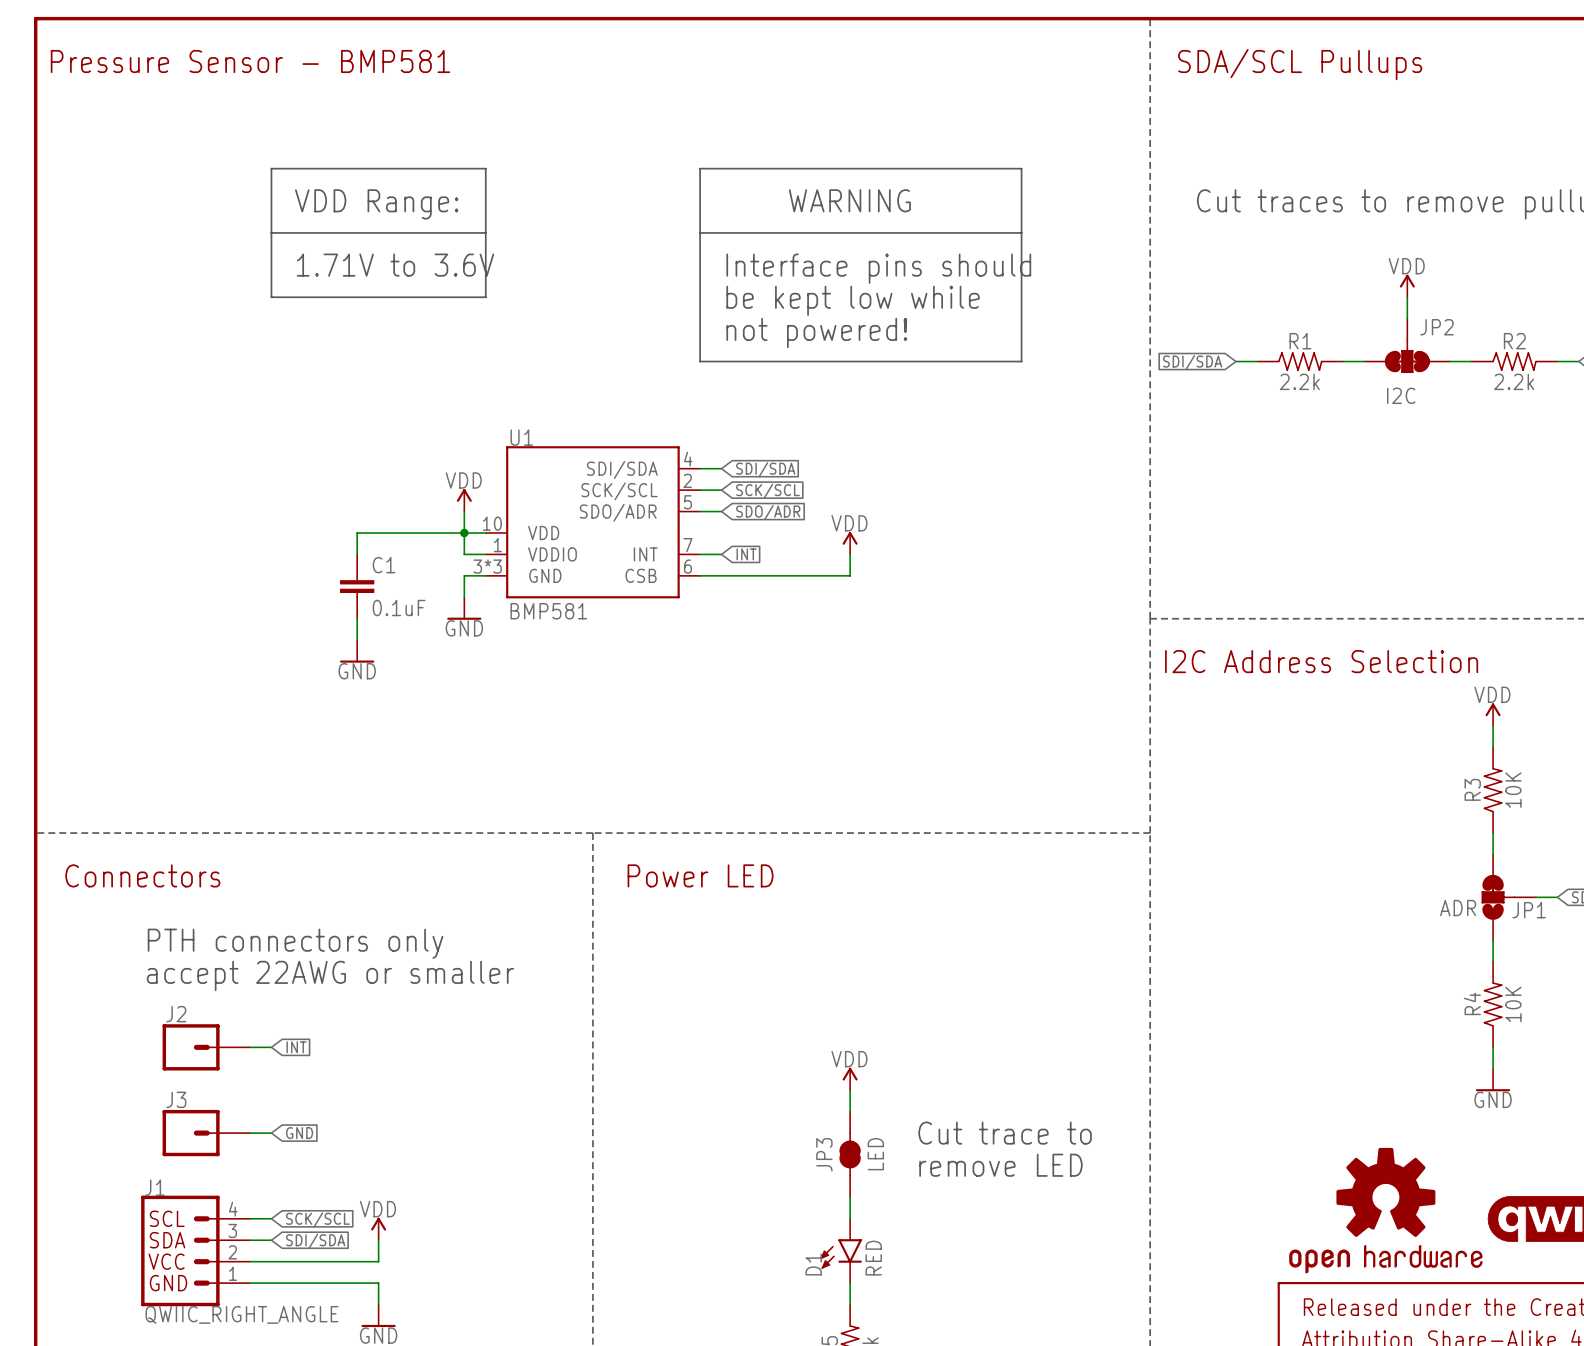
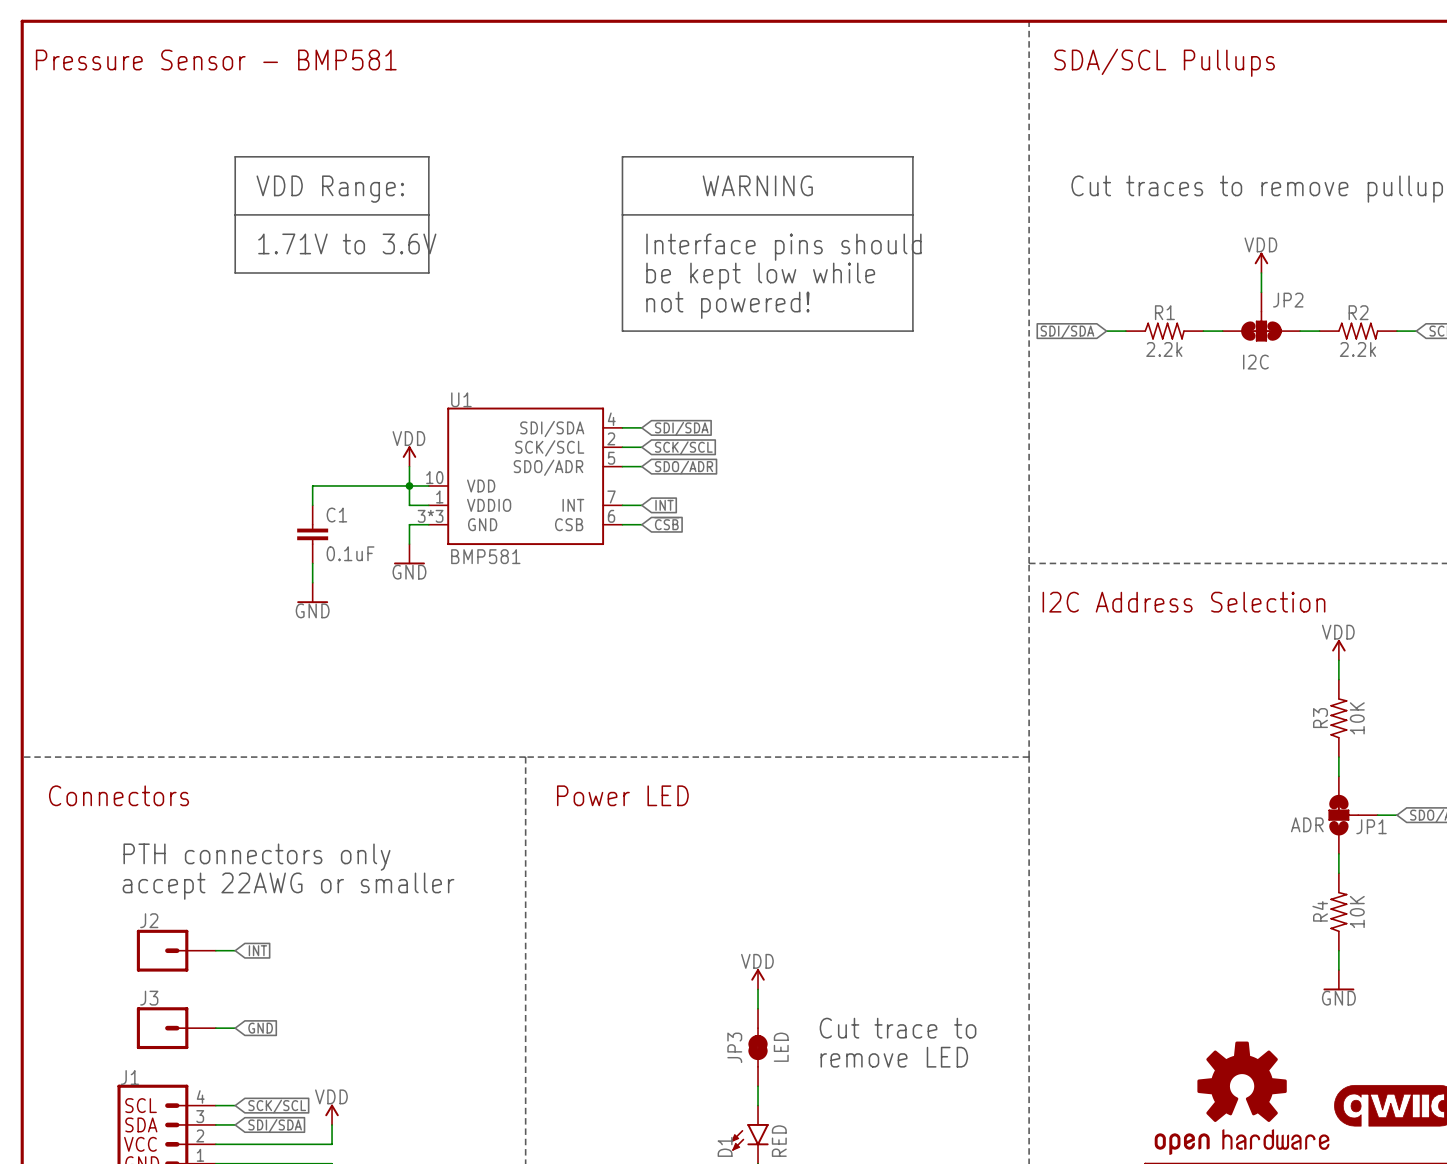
power symbol: VDD (850, 543) -> none
wire: (850, 554) (850, 575) (721, 575) -> none
global label: none -> ~{CSB} (666, 523)

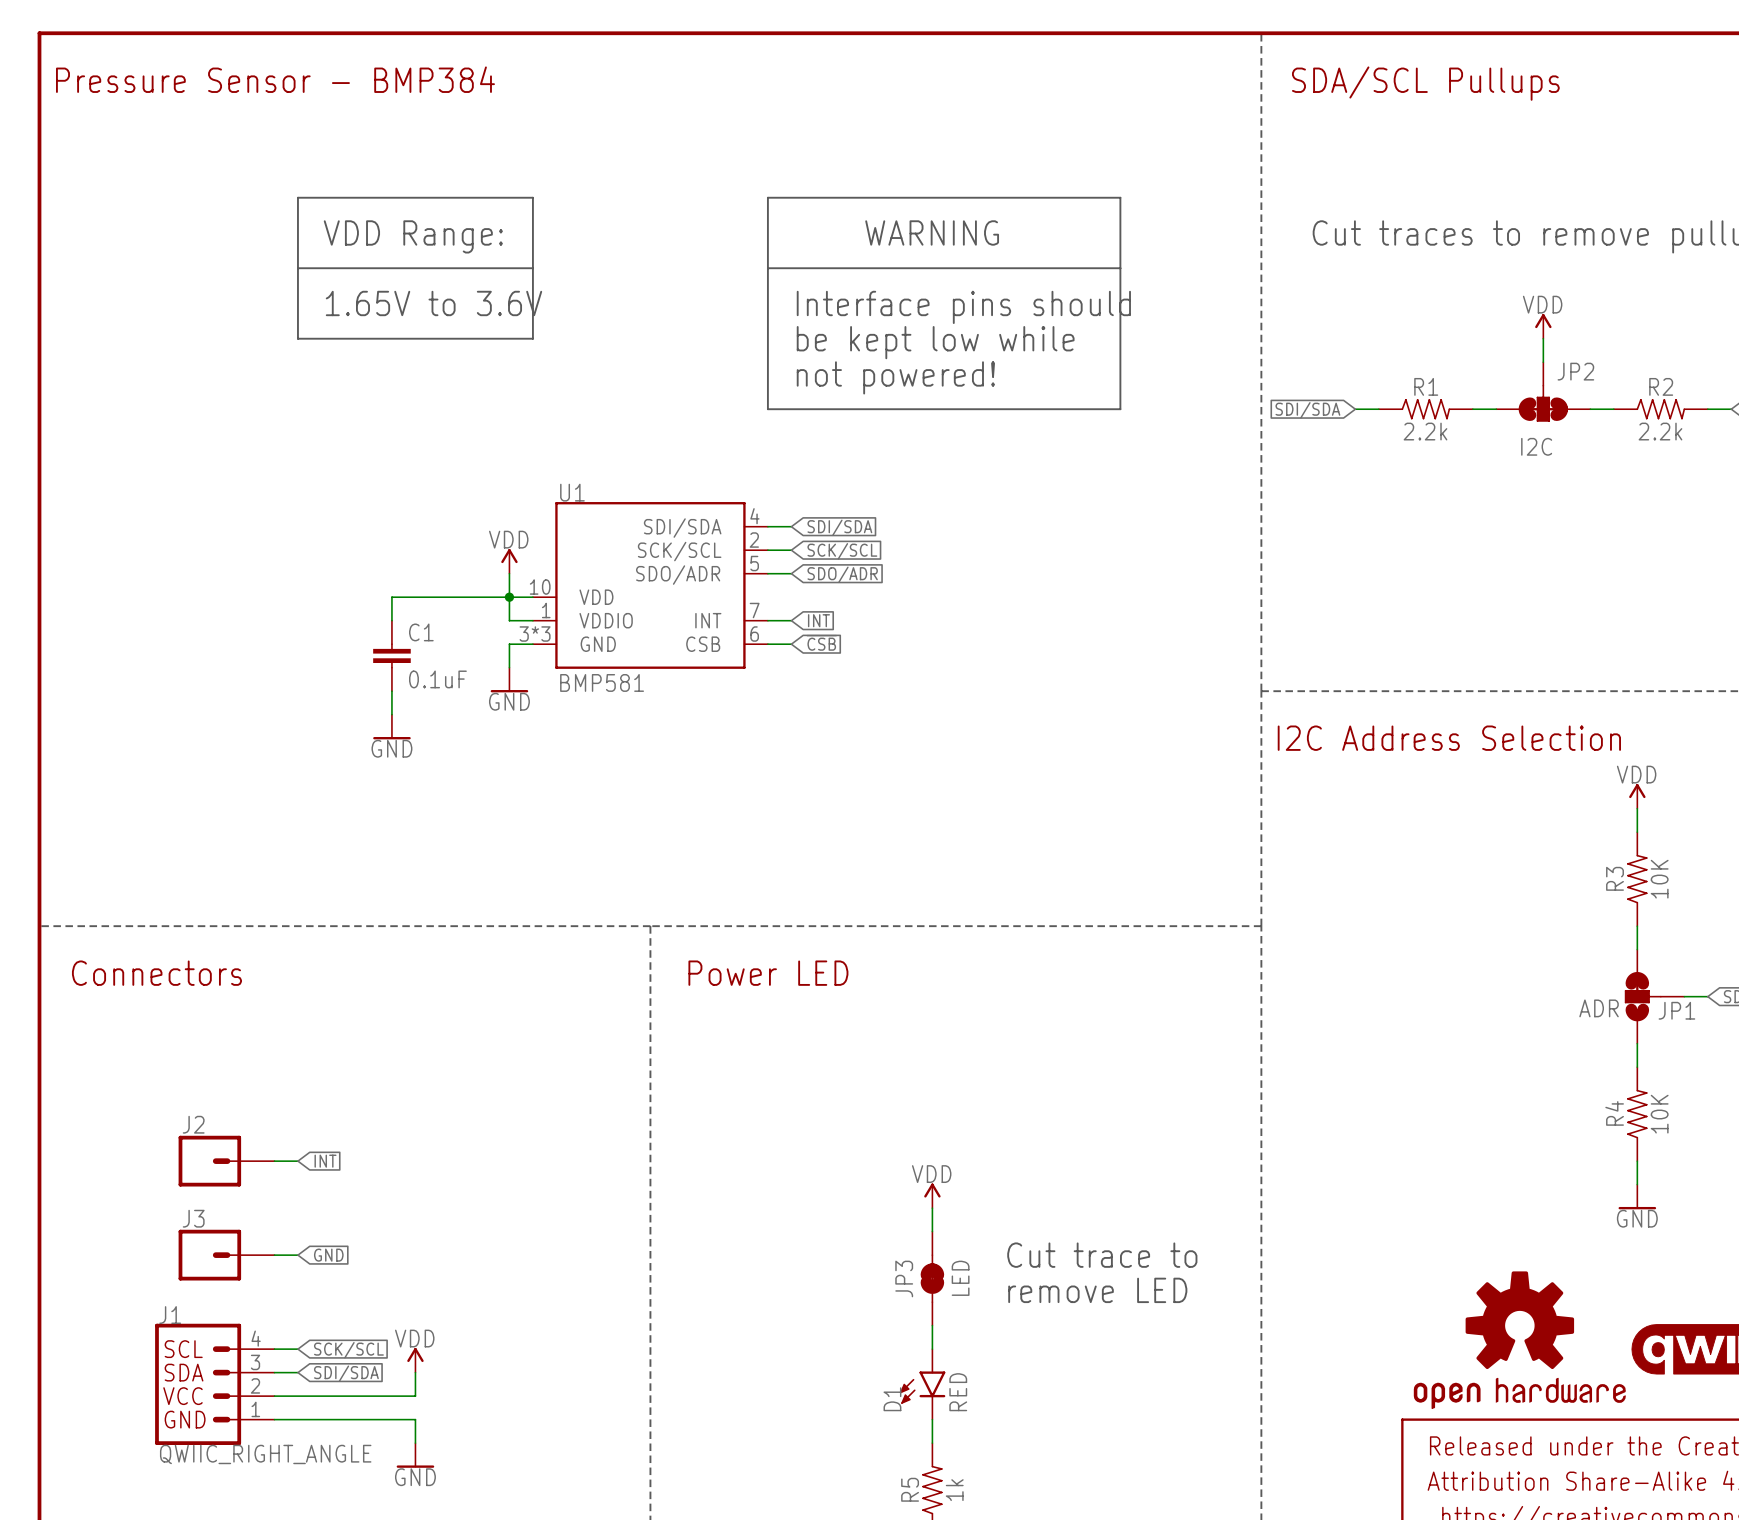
text: Pressure Sensor - BMP581 (216, 60) -> Pressure Sensor - BMP384 (275, 79)
text: 1.71V to 3.6V (347, 243) -> 1.65V to 3.6V (433, 303)
text: PTH connectors only (256, 857) -> none
text: accept 22AWG or smaller (288, 886) -> none

